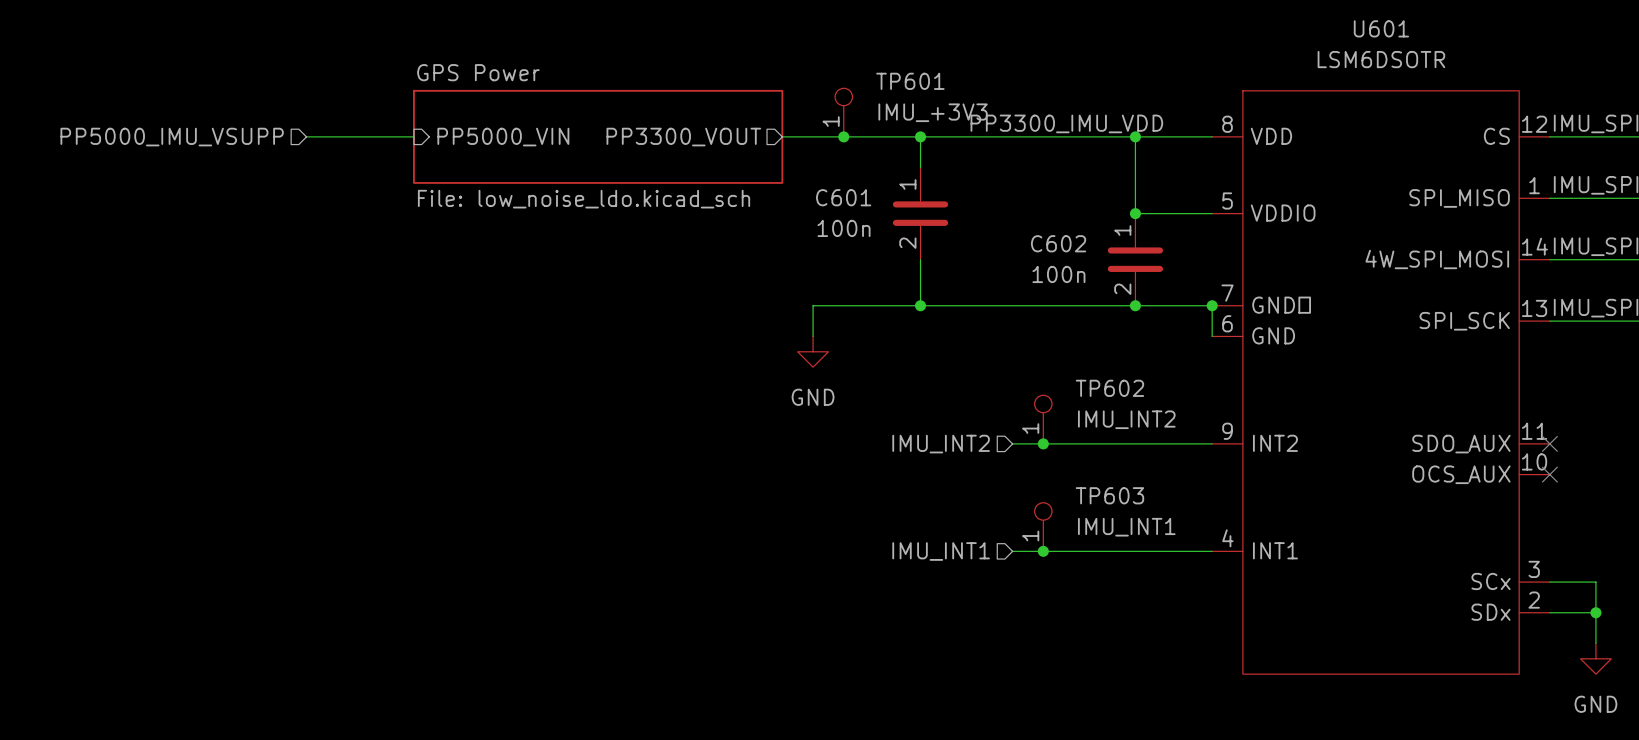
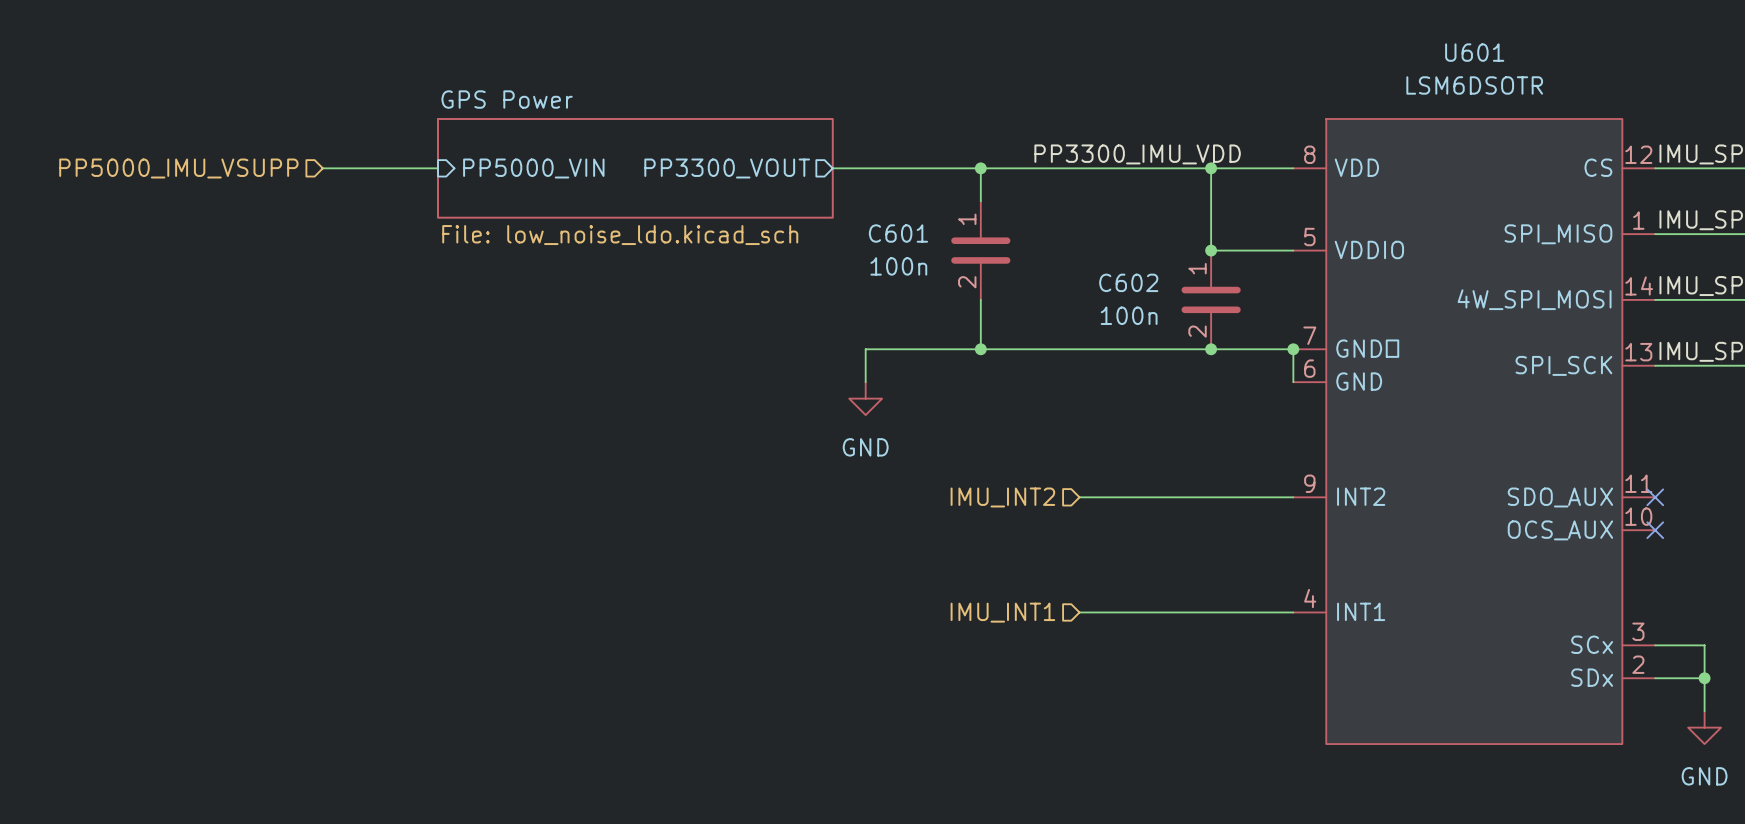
TP601: IMU_+3V3 (843, 112) -> none
junction: (843, 136) -> none
TP602: IMU_INT2 (1043, 419) -> none
junction: (1043, 443) -> none
TP603: IMU_INT1 (1043, 527) -> none
junction: (1043, 551) -> none

